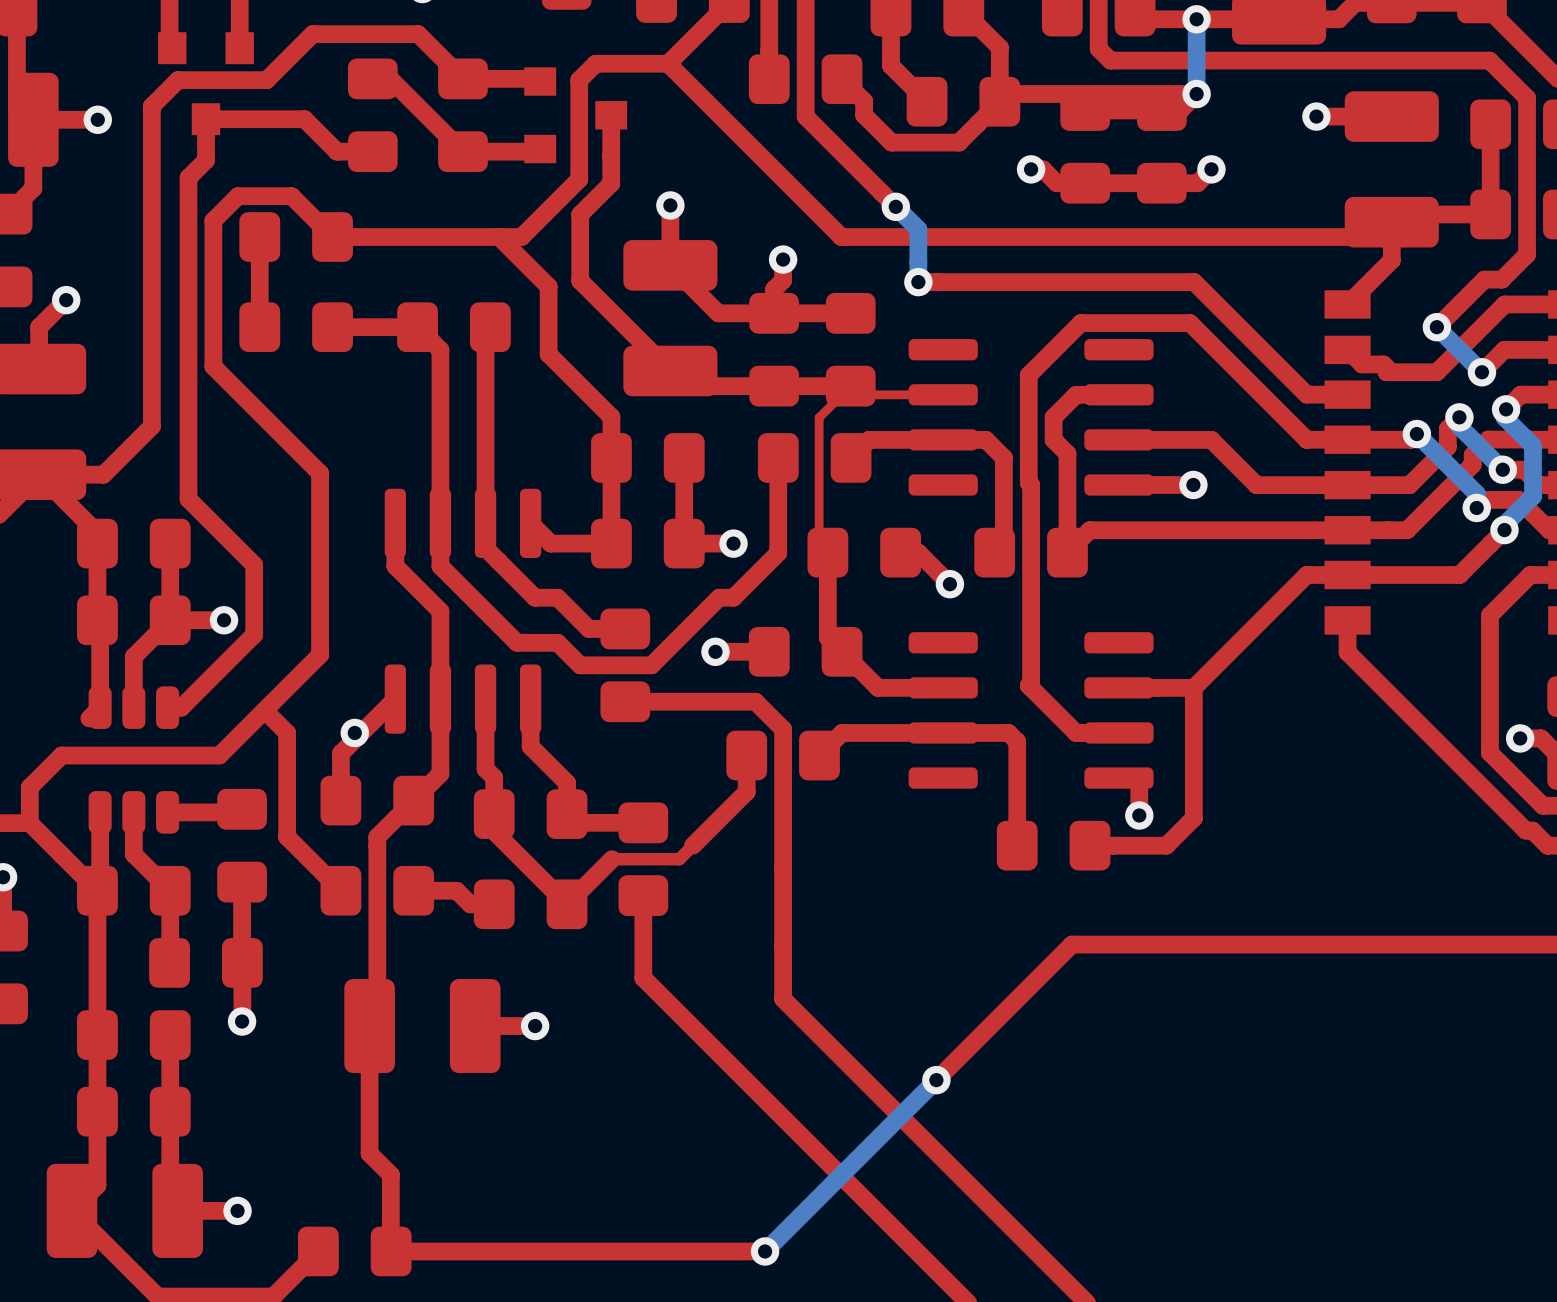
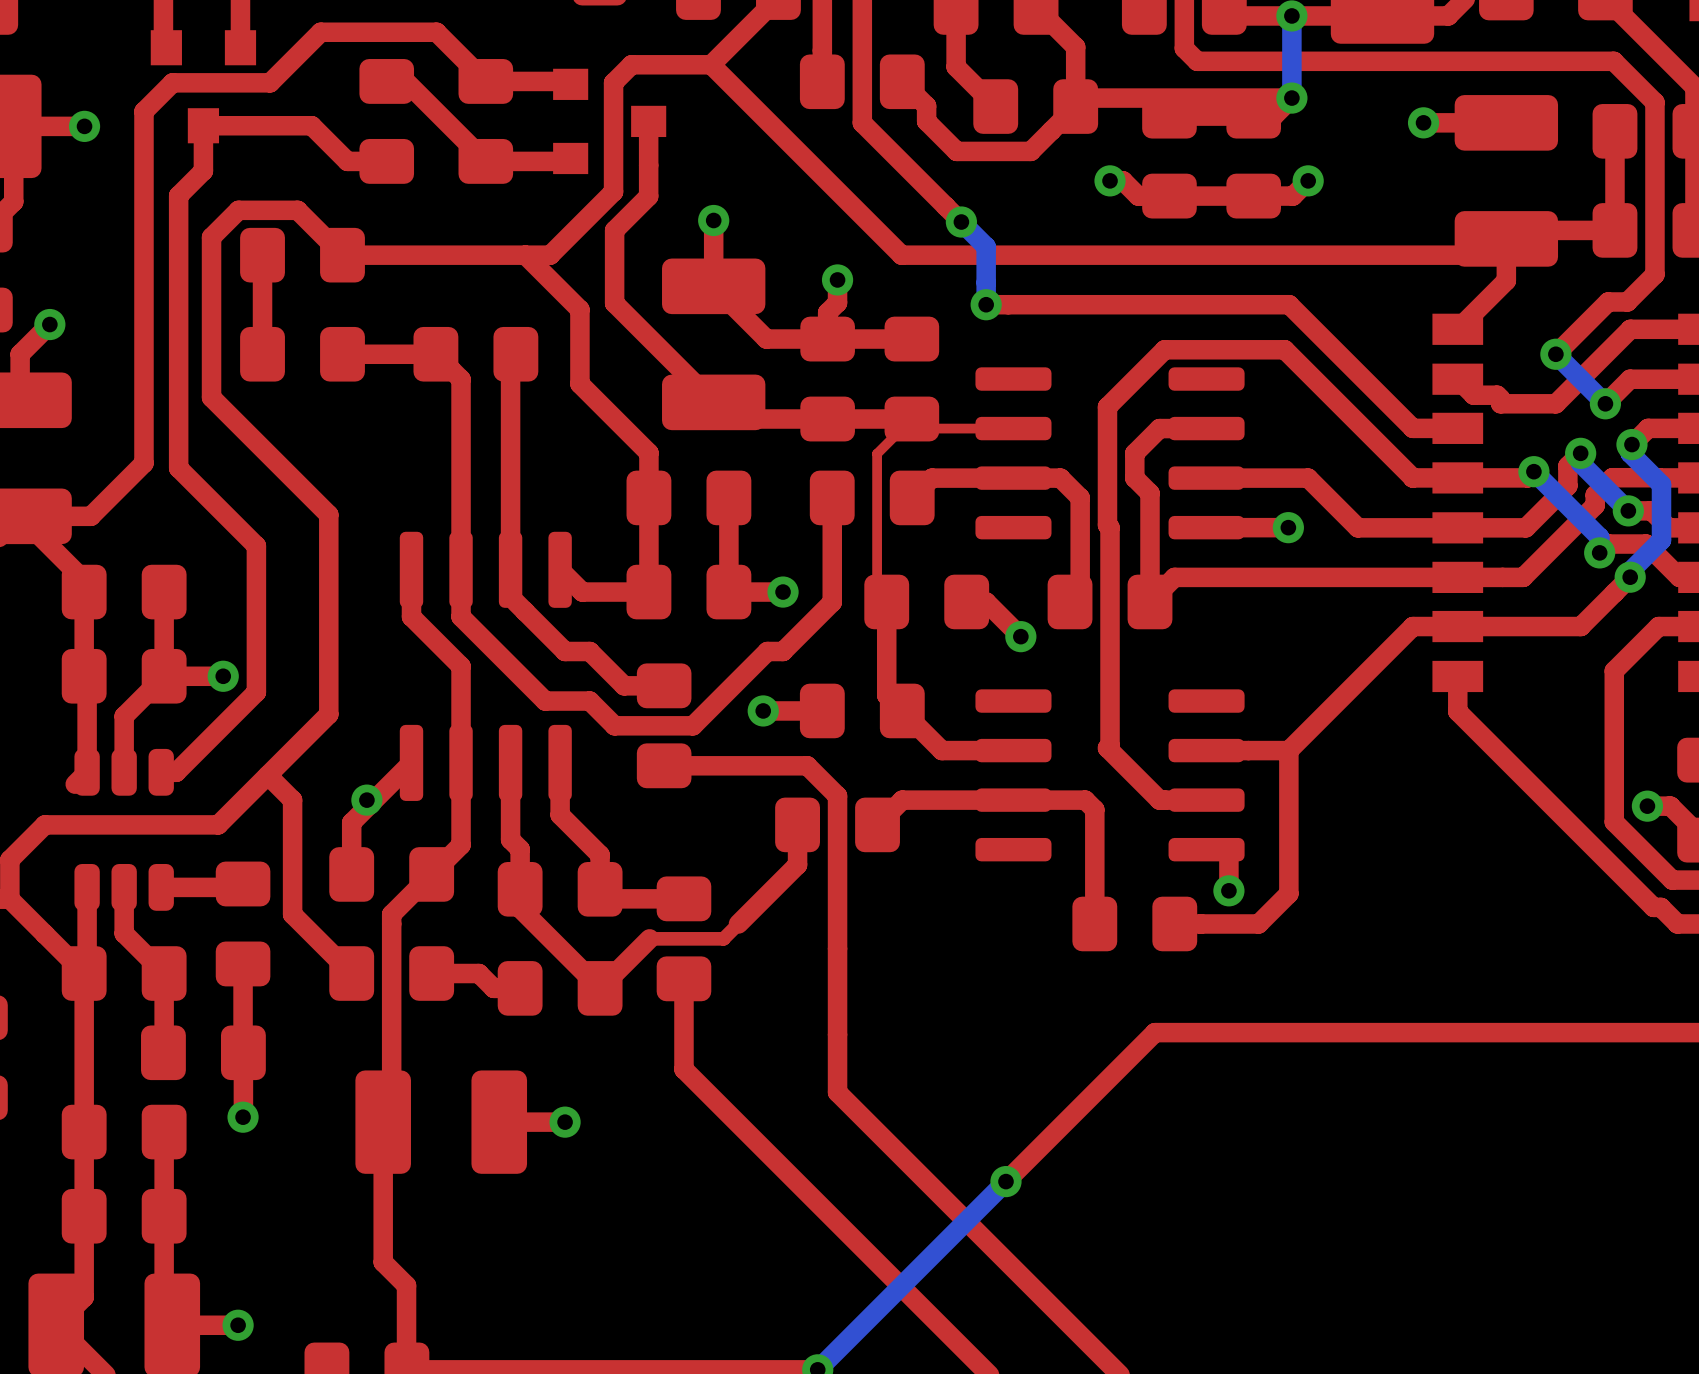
top track: (188, 177) (188, 499) (254, 564) -> (184, 190) (178, 195) (178, 468) (256, 545) (256, 615)

